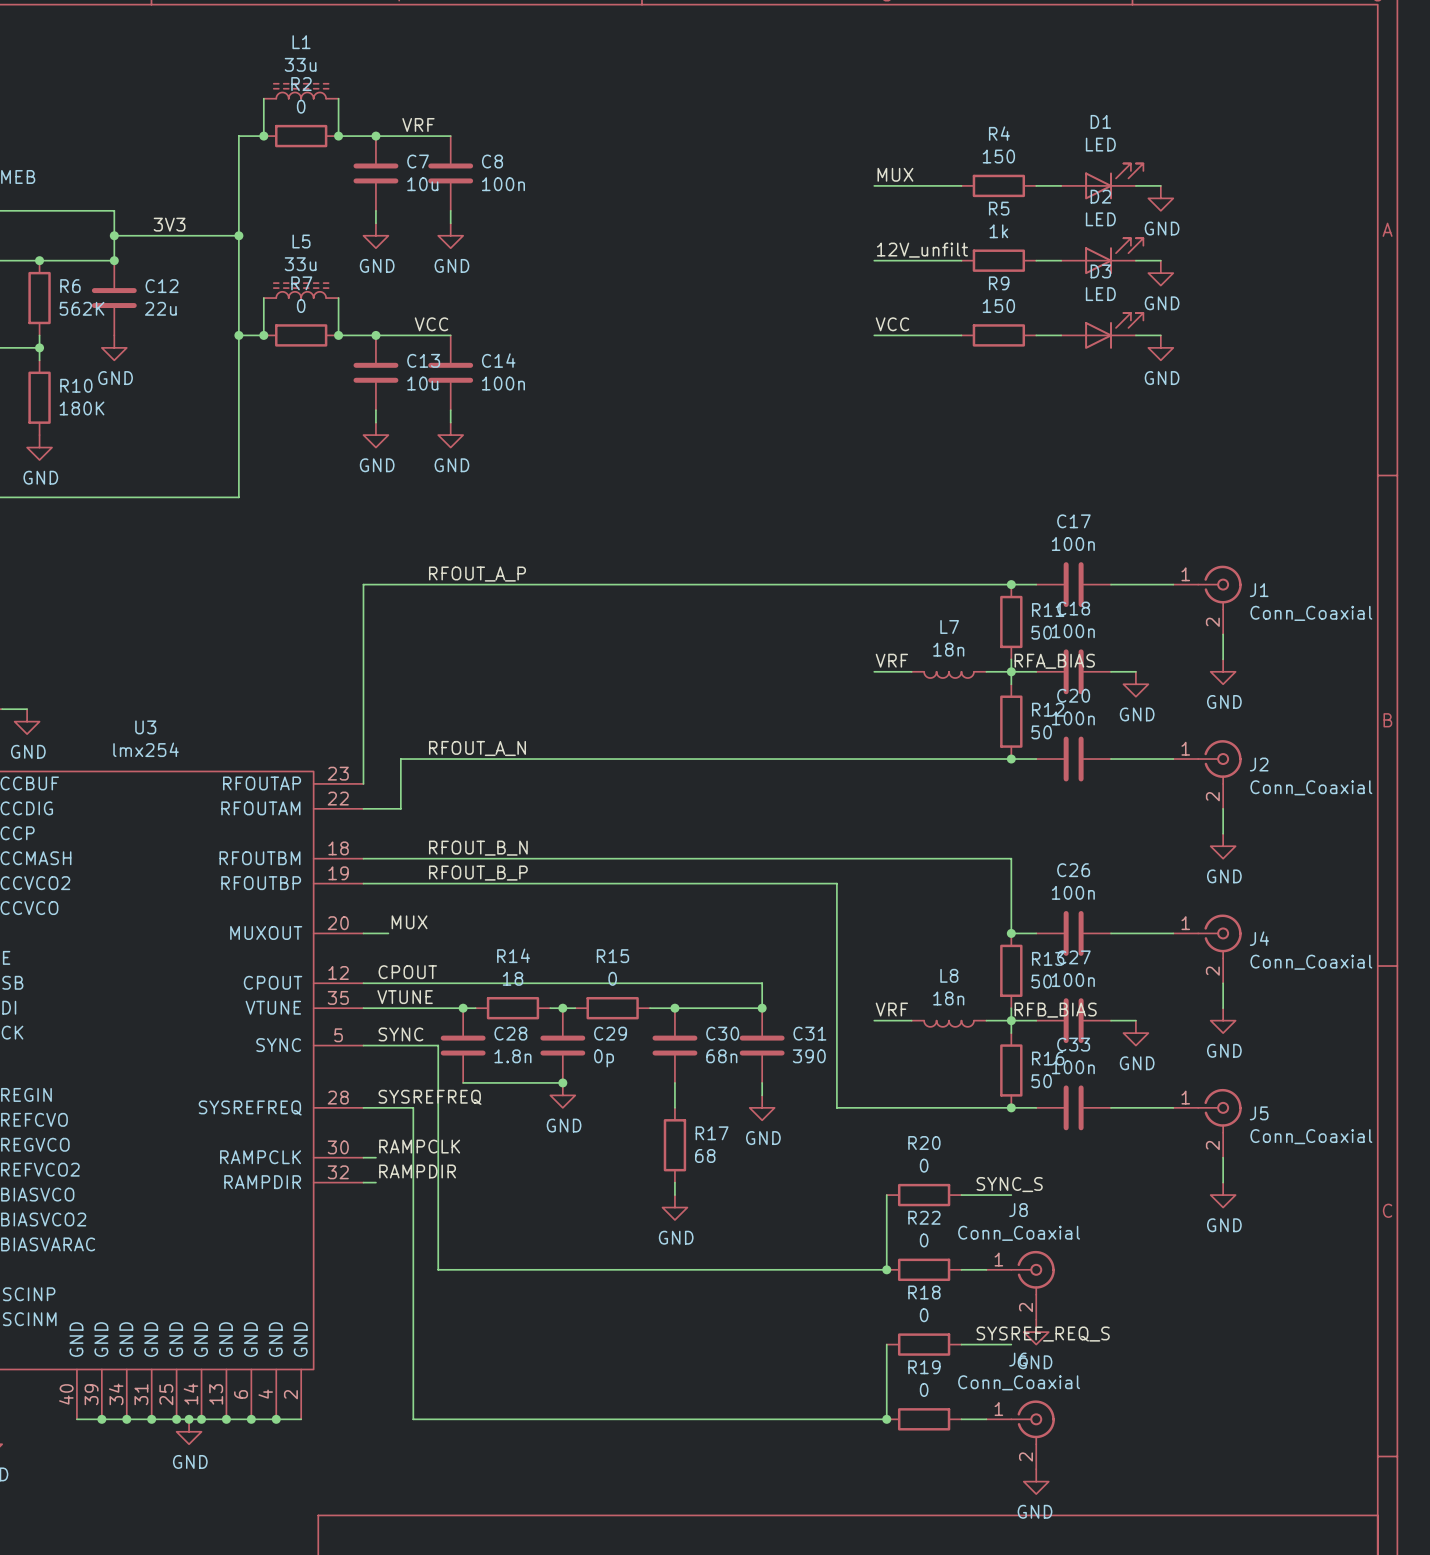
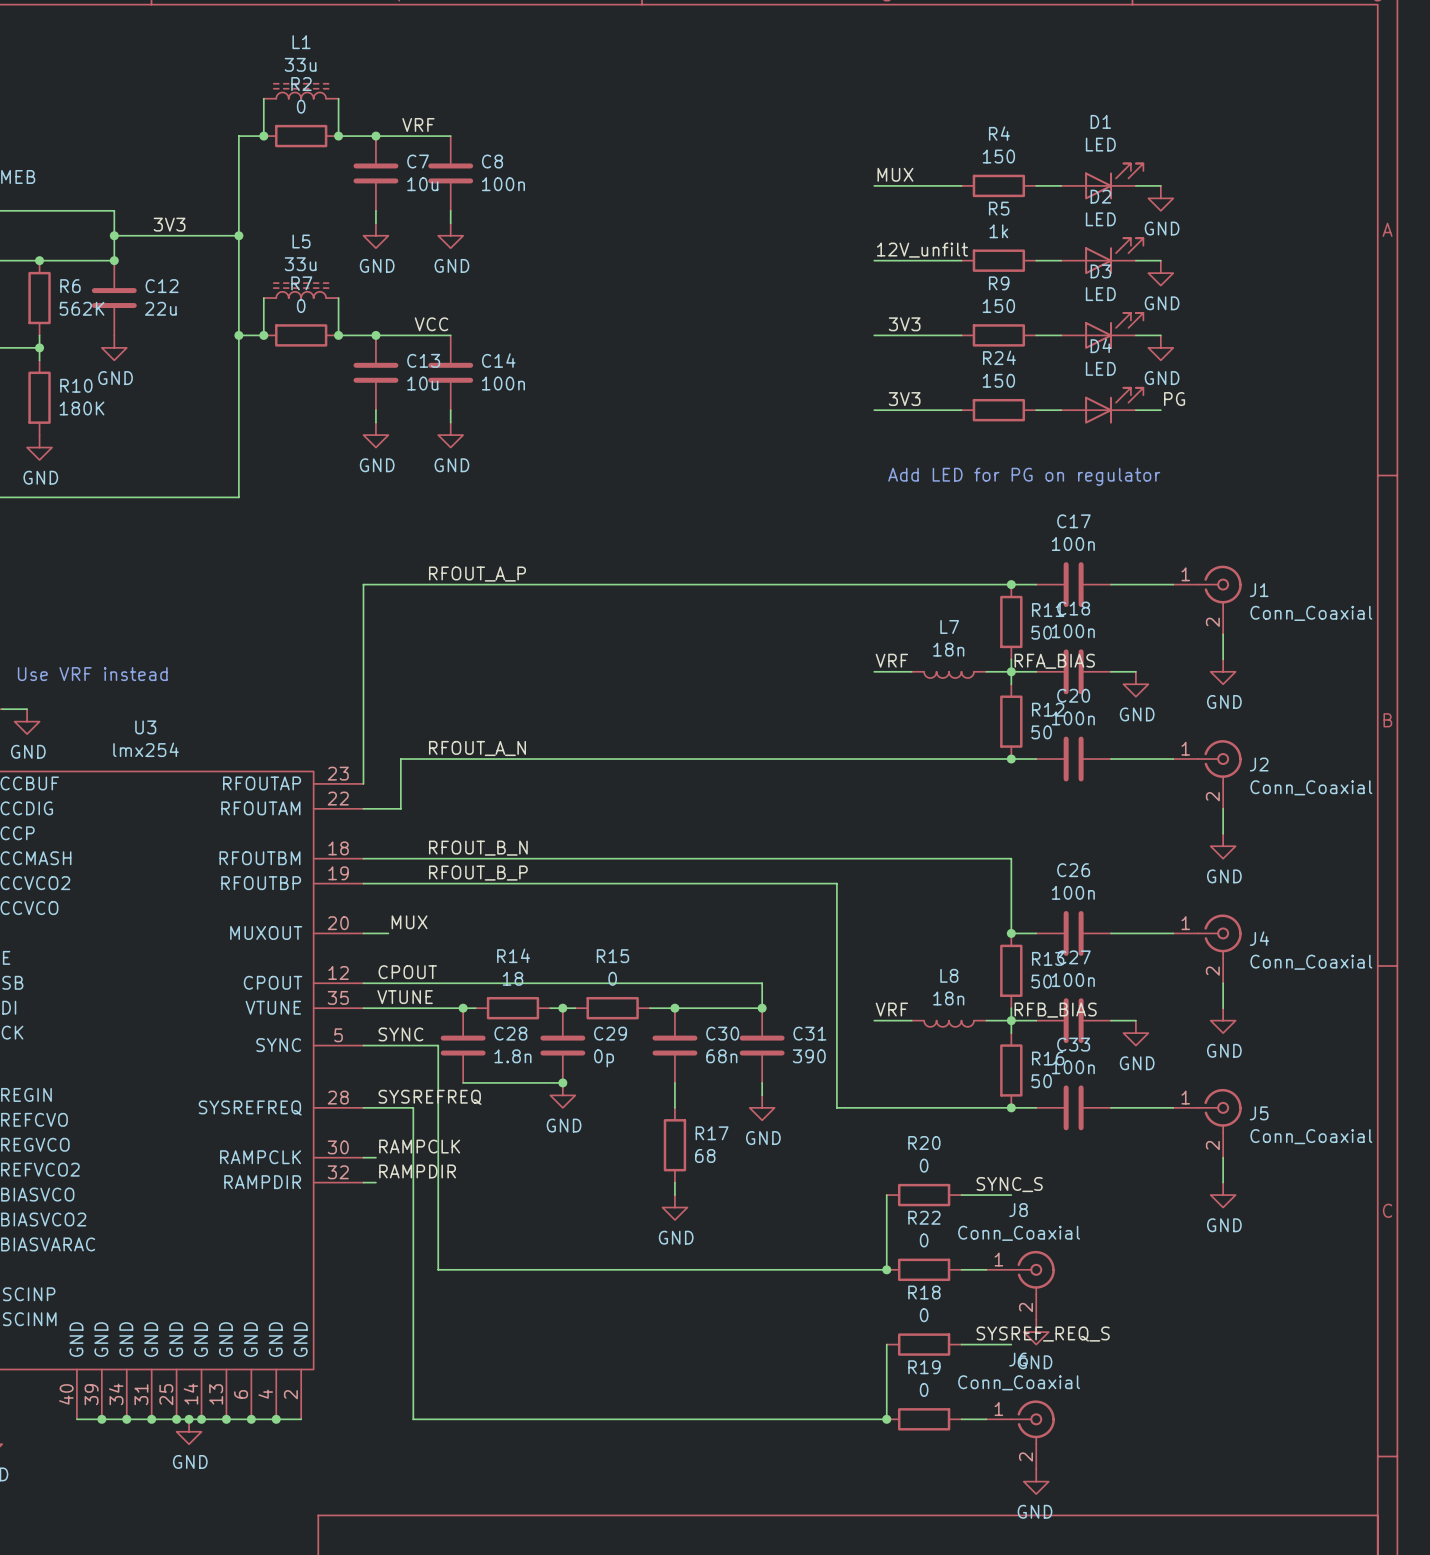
label: VCC (892, 324) -> none
label: none -> 3V3 (904, 324)
label: none -> 3V3 (904, 399)
label: none -> PG (1174, 399)
D4: none -> LED (1102, 405)
wire: none -> (874, 410) (961, 410)
R24: none -> 150 (998, 410)
wire: none -> (1036, 410) (1061, 410)
wire: none -> (1135, 410) (1160, 410)
text: none -> Add LED for PG on regulator (1024, 476)
text: none -> Use VRF instead (92, 674)

